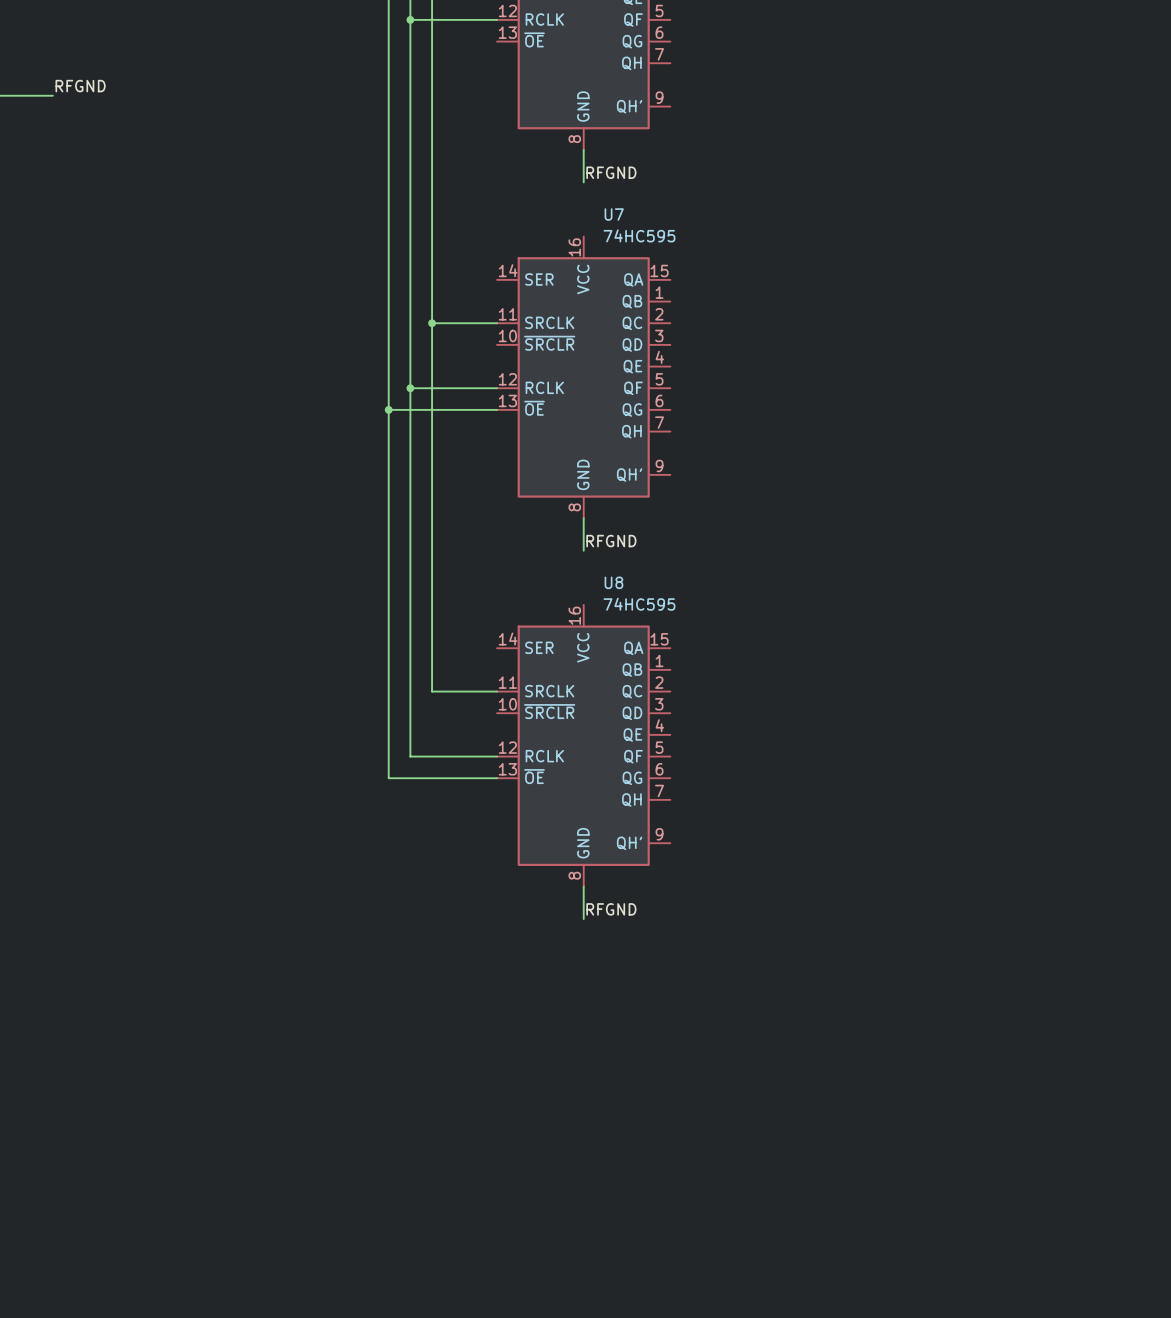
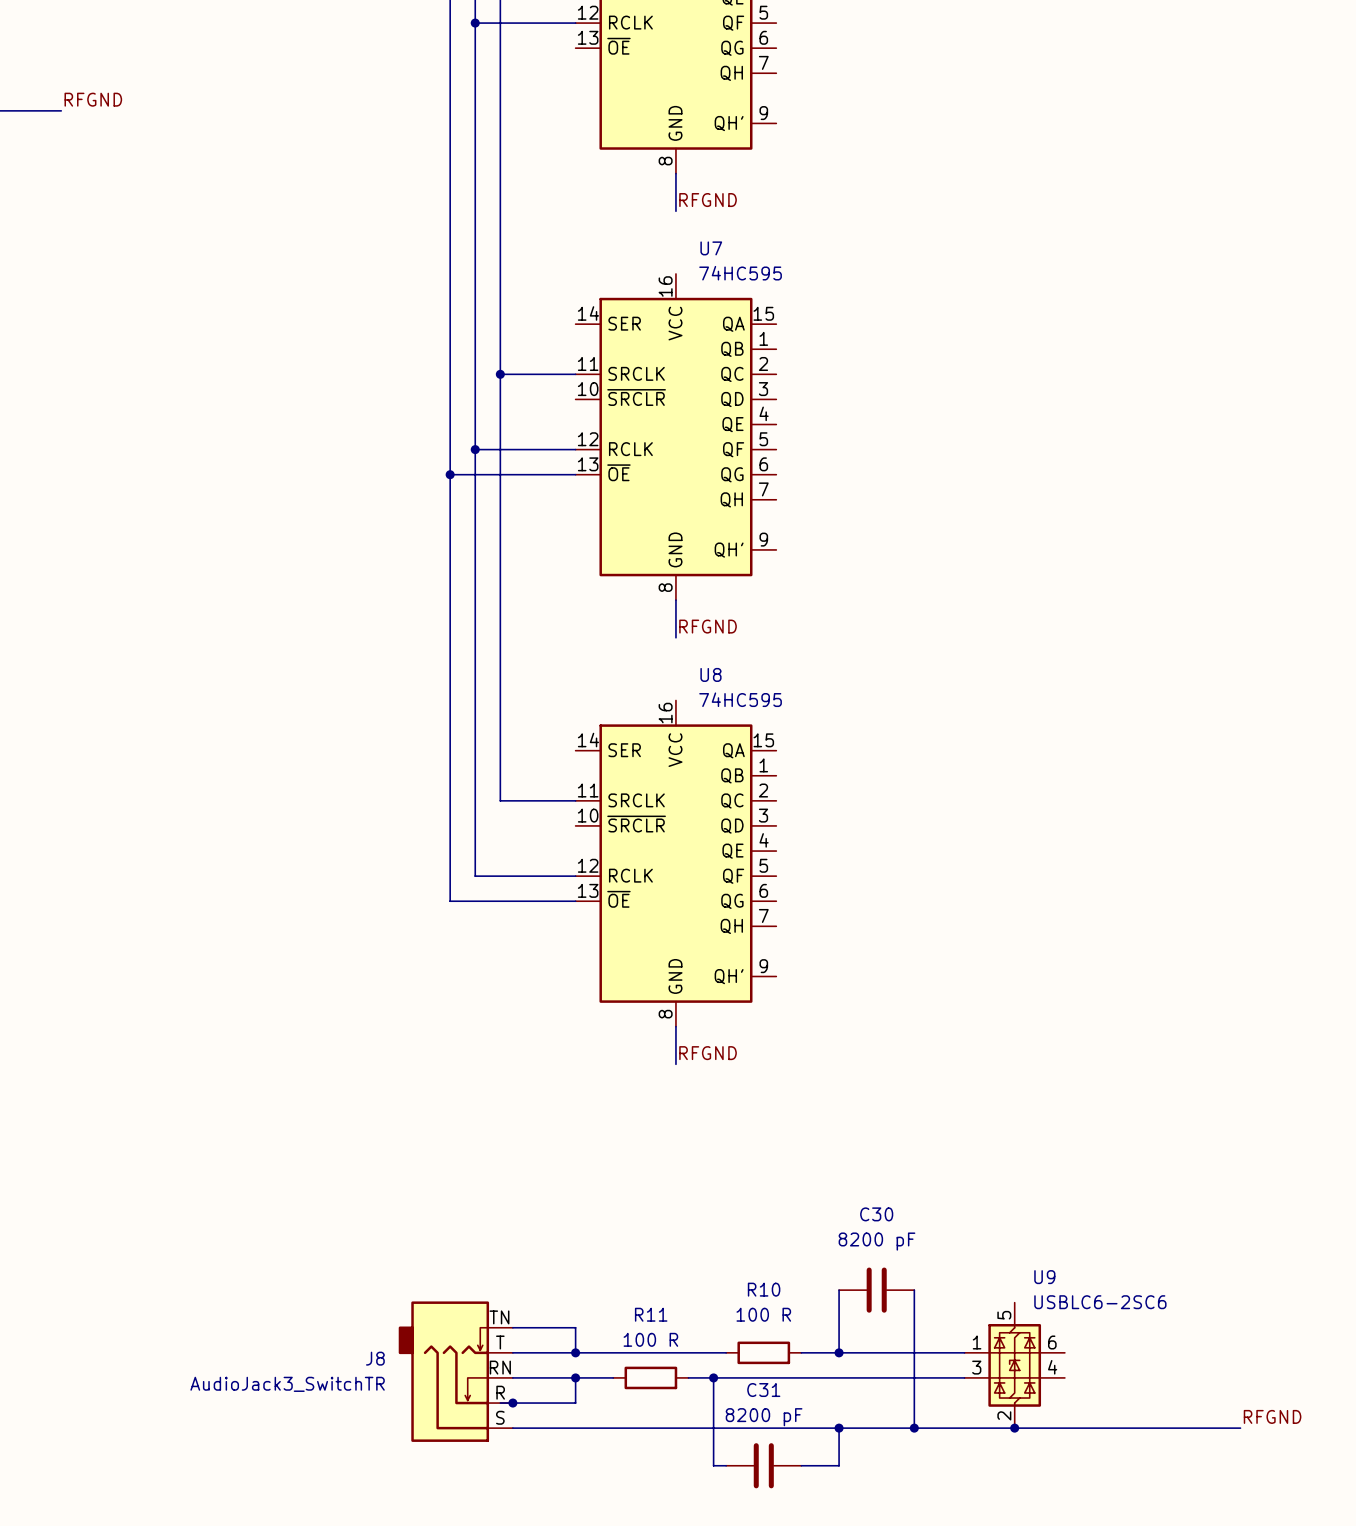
wire: none -> (839, 1290) (839, 1352)
C30: none -> 8200 pF (876, 1290)
wire: none -> (914, 1290) (914, 1428)
wire: none -> (512, 1327) (575, 1327) (575, 1352)
wire: none -> (512, 1352) (726, 1352)
junction: none -> (575, 1352)
R10: none -> 100 R (763, 1352)
wire: none -> (801, 1352) (964, 1352)
junction: none -> (839, 1352)
U9: none -> USBLC6-2SC6 (1014, 1365)
J8: none -> AudioJack3_SwitchTR (455, 1371)
wire: none -> (512, 1377) (613, 1377)
wire: none -> (575, 1377) (575, 1403) (500, 1403)
junction: none -> (575, 1377)
R11: none -> 100 R (650, 1377)
wire: none -> (688, 1377) (964, 1377)
wire: none -> (713, 1377) (713, 1465) (726, 1465)
junction: none -> (713, 1377)
junction: none -> (512, 1403)
label: none -> RFGND (1272, 1416)
wire: none -> (512, 1428) (1240, 1428)
wire: none -> (839, 1428) (839, 1465) (801, 1465)
junction: none -> (839, 1428)
junction: none -> (914, 1428)
junction: none -> (1014, 1428)
C31: none -> 8200 pF (763, 1465)

